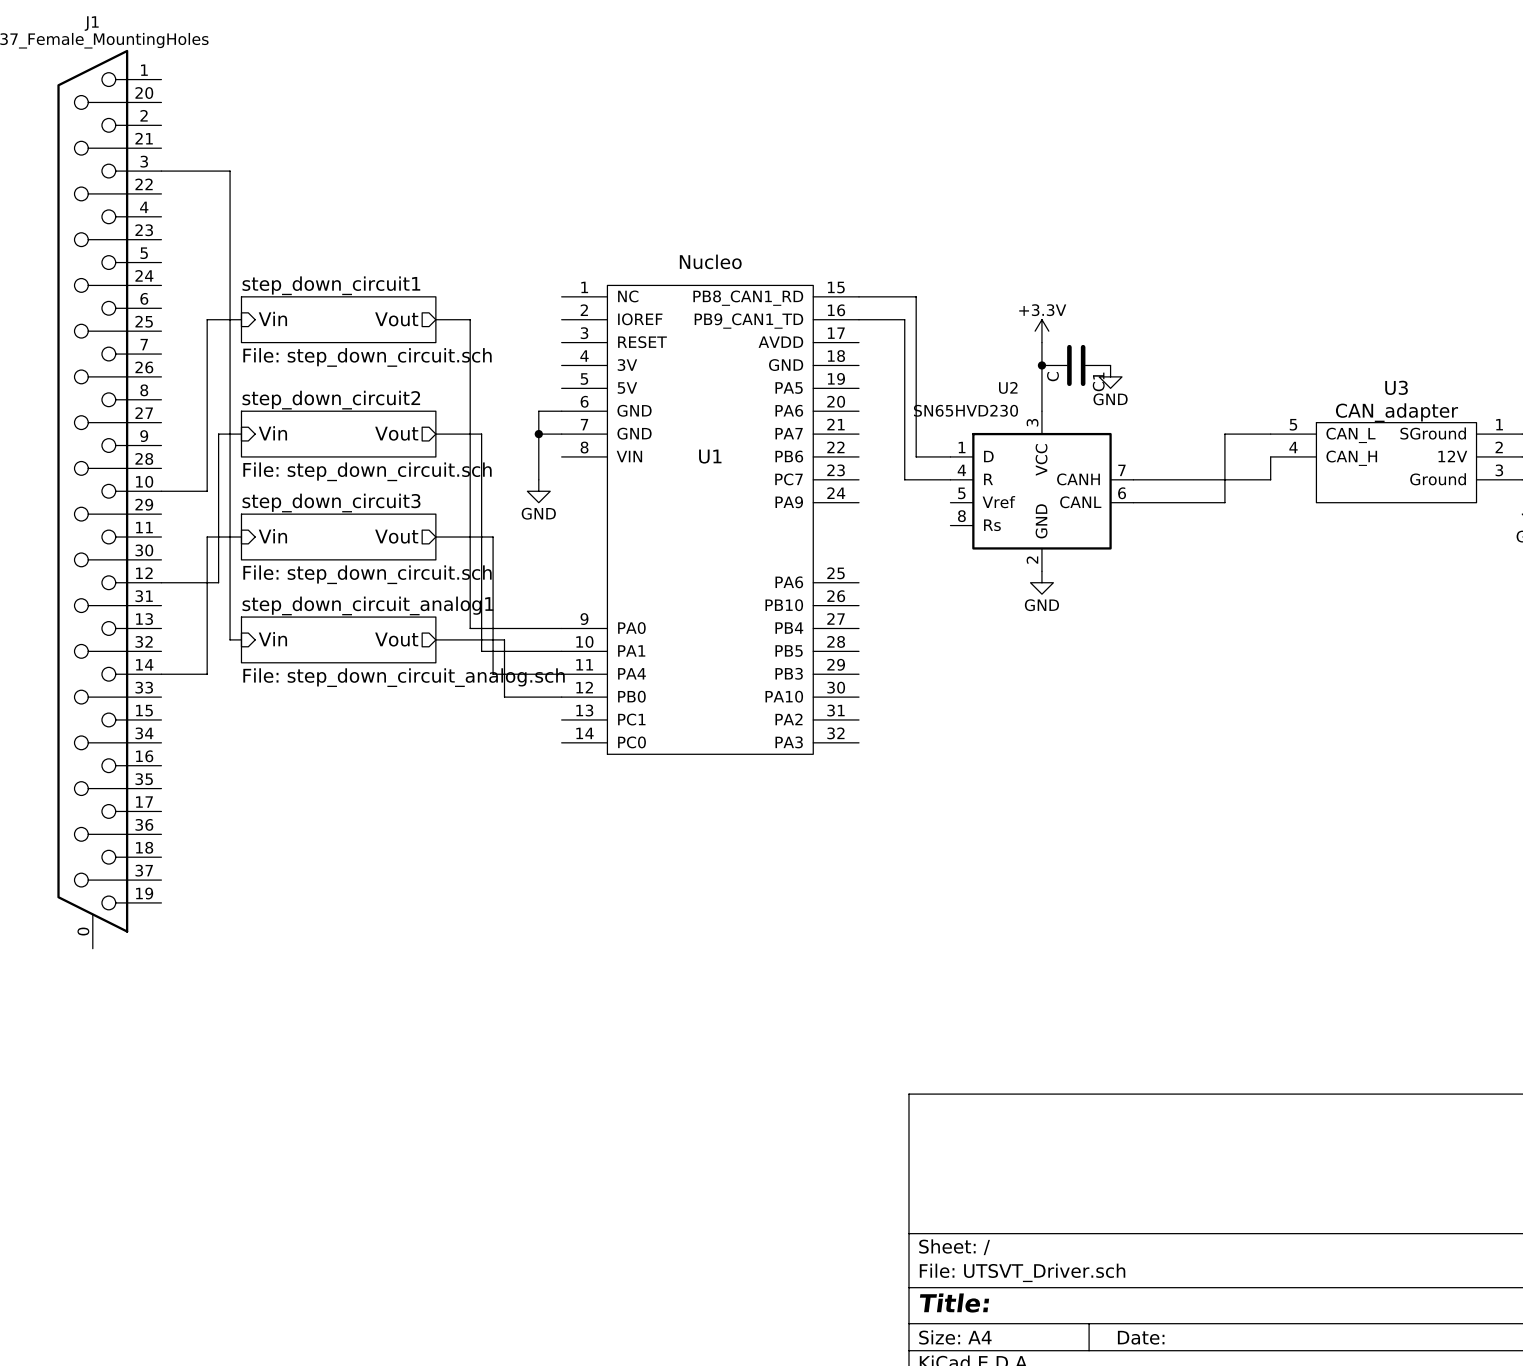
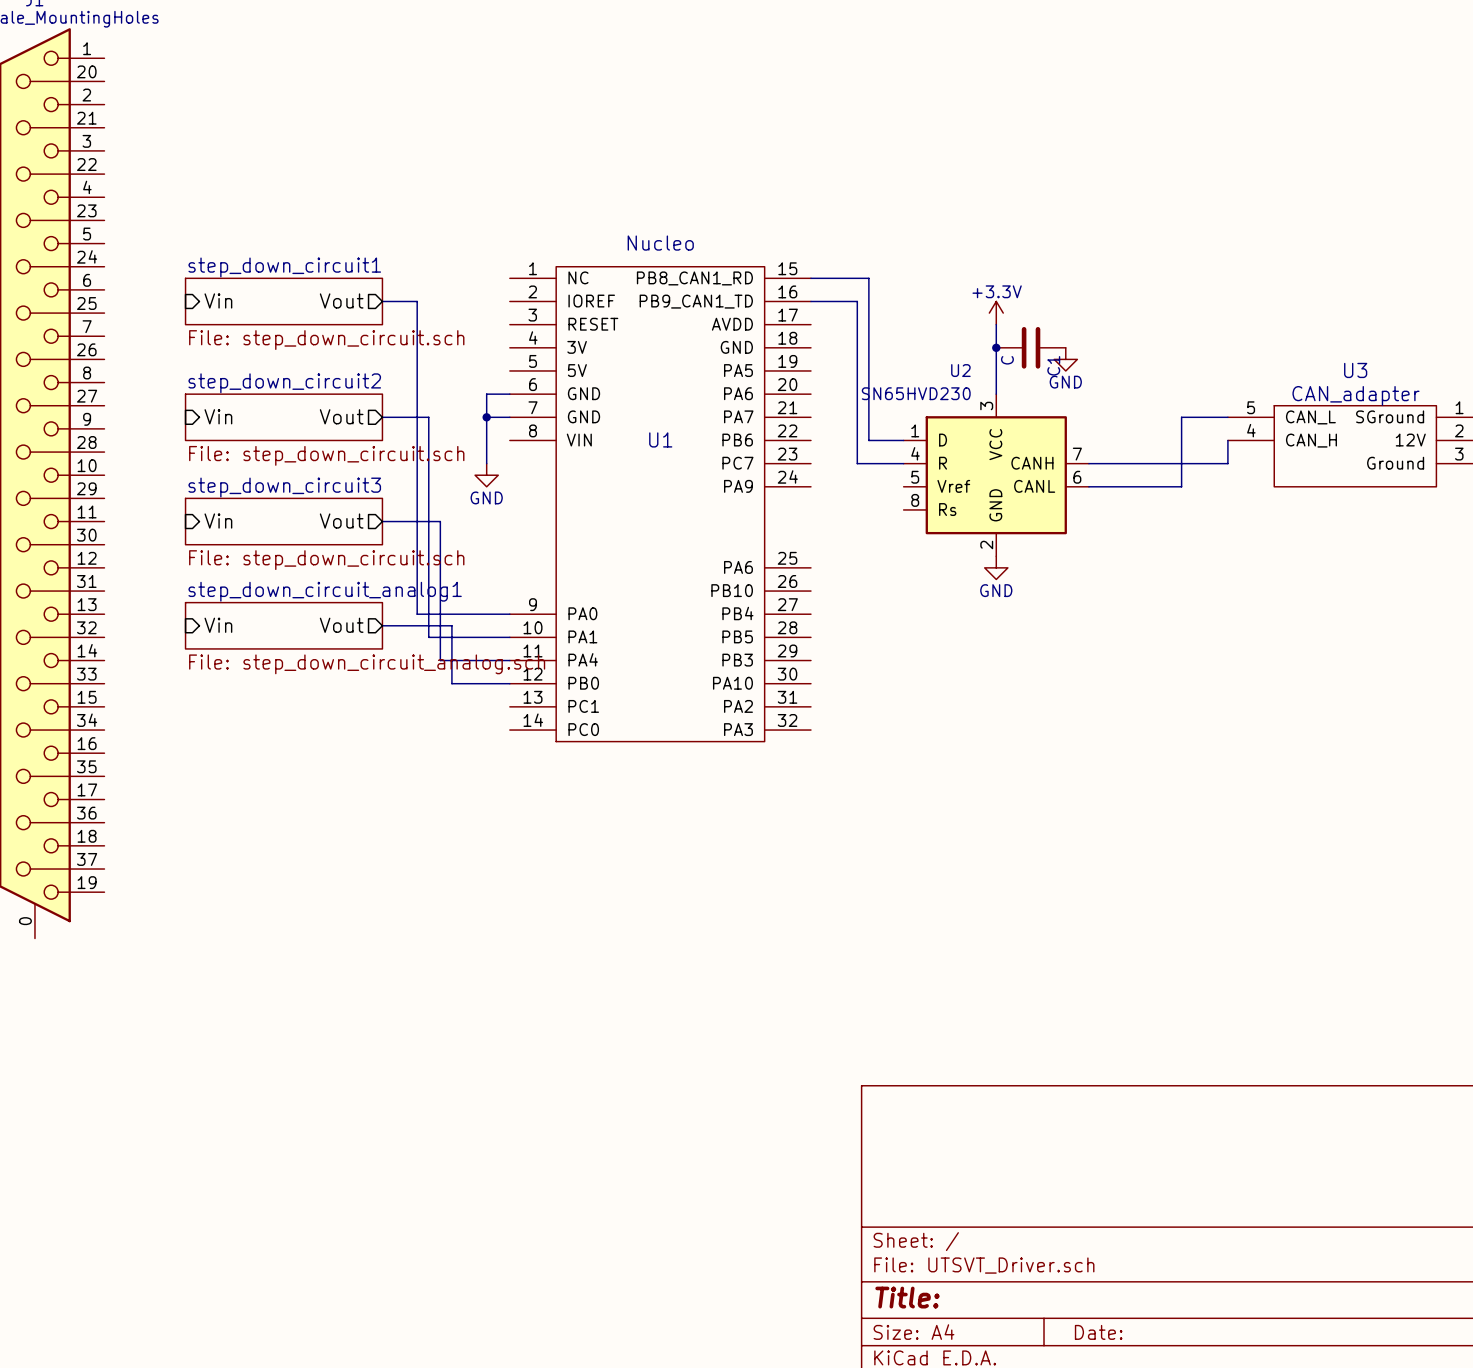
wire: (161, 171) (230, 171) (230, 639) (241, 639) -> none
wire: (241, 319) (207, 319) (207, 491) (161, 491) -> none
wire: (241, 434) (218, 434) (218, 582) (161, 582) -> none
wire: (241, 537) (207, 537) (207, 674) (161, 674) -> none

